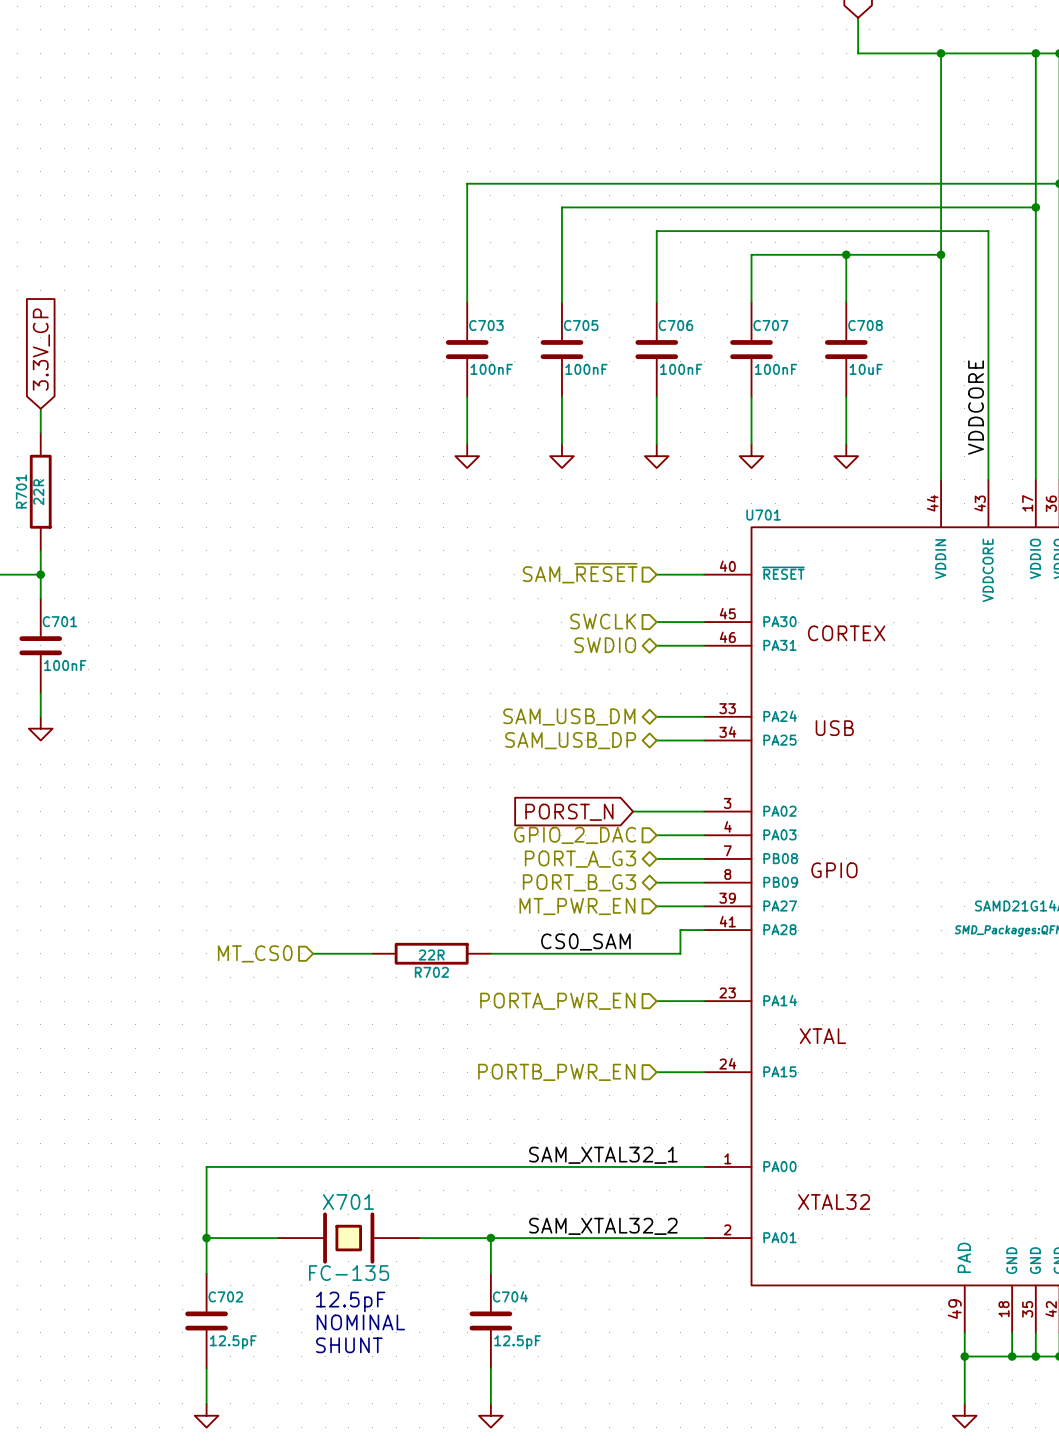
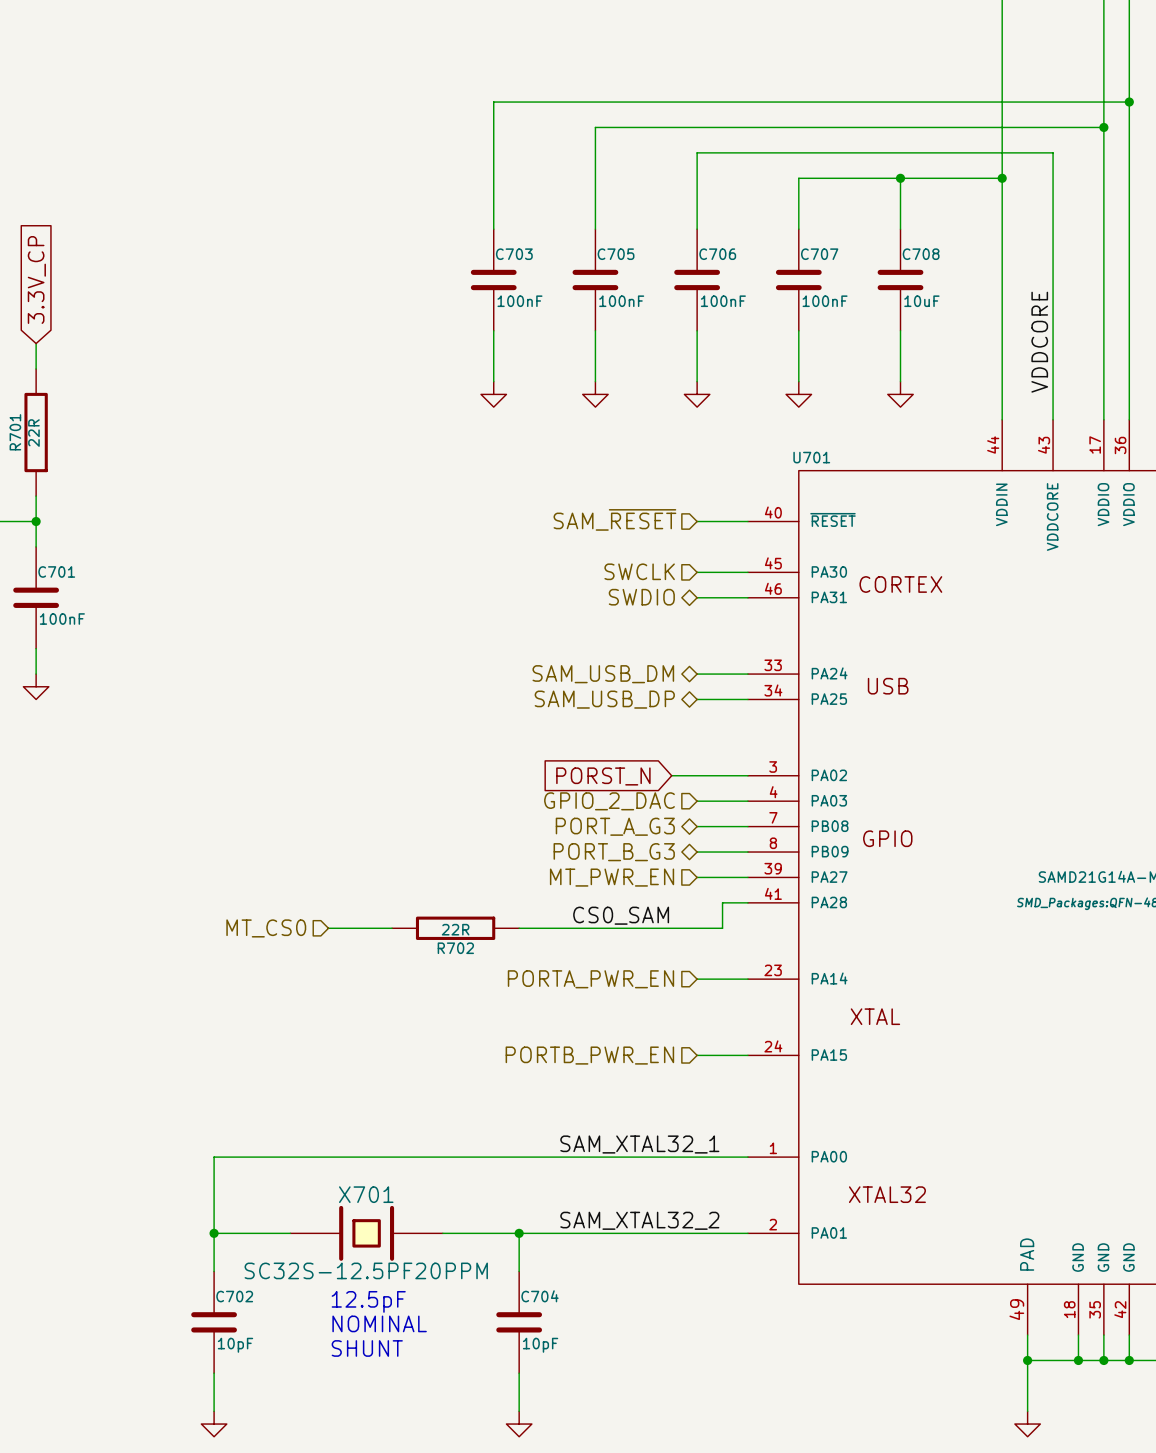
X701 value: FC-135 (349, 1273) -> SC32S-12.5PF20PPM (366, 1270)
C702 value: 12.5pF (233, 1342) -> 10pF (235, 1345)
C704 value: 12.5pF (517, 1342) -> 10pF (540, 1345)

